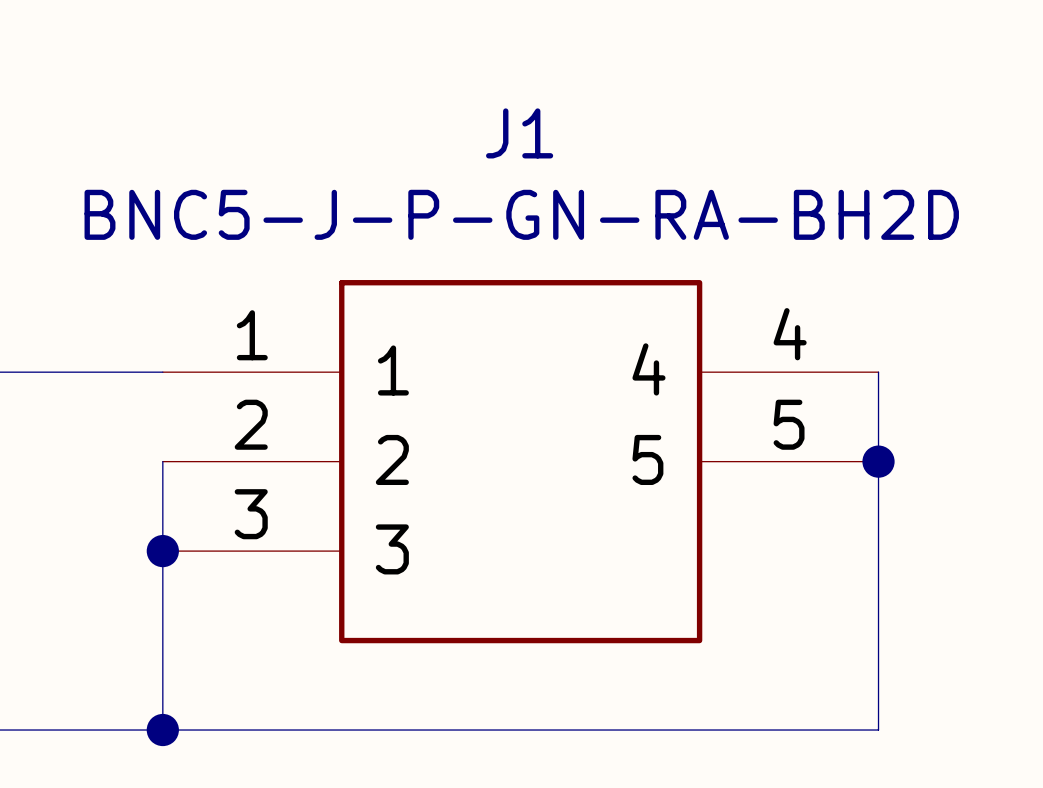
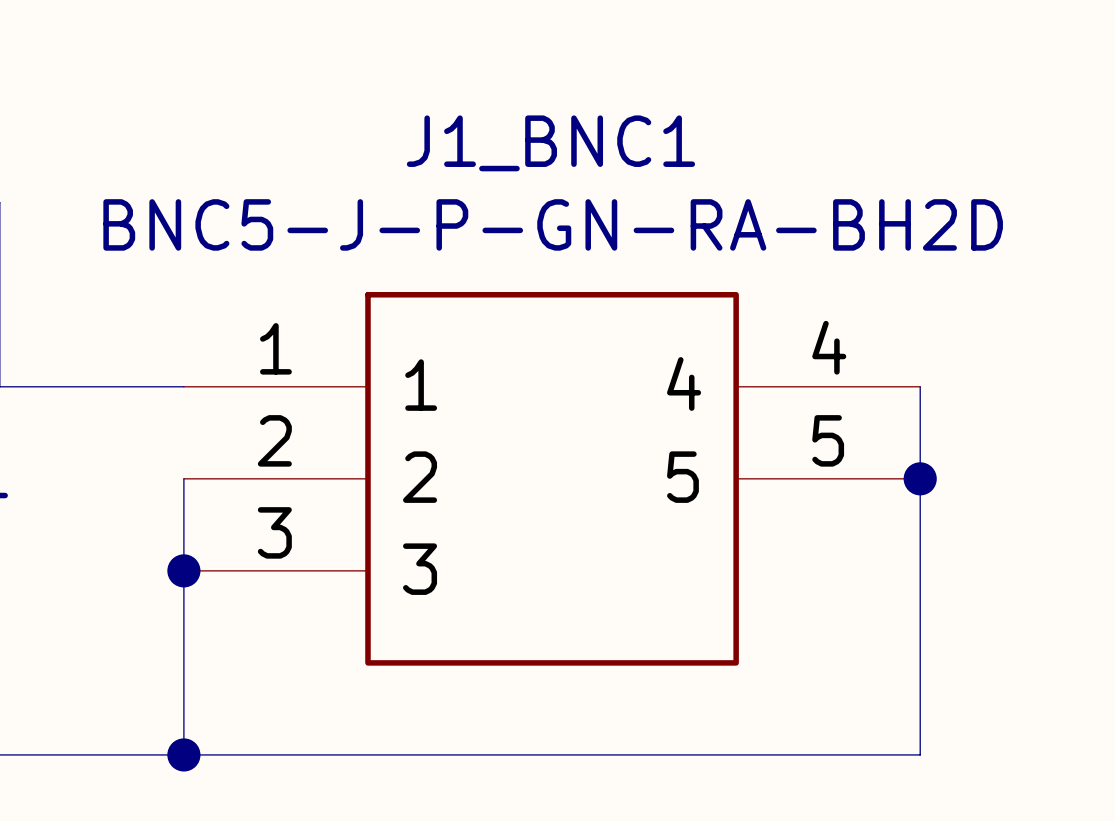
J1 name: J1 (519, 133) -> J1_BNC1 (550, 143)

